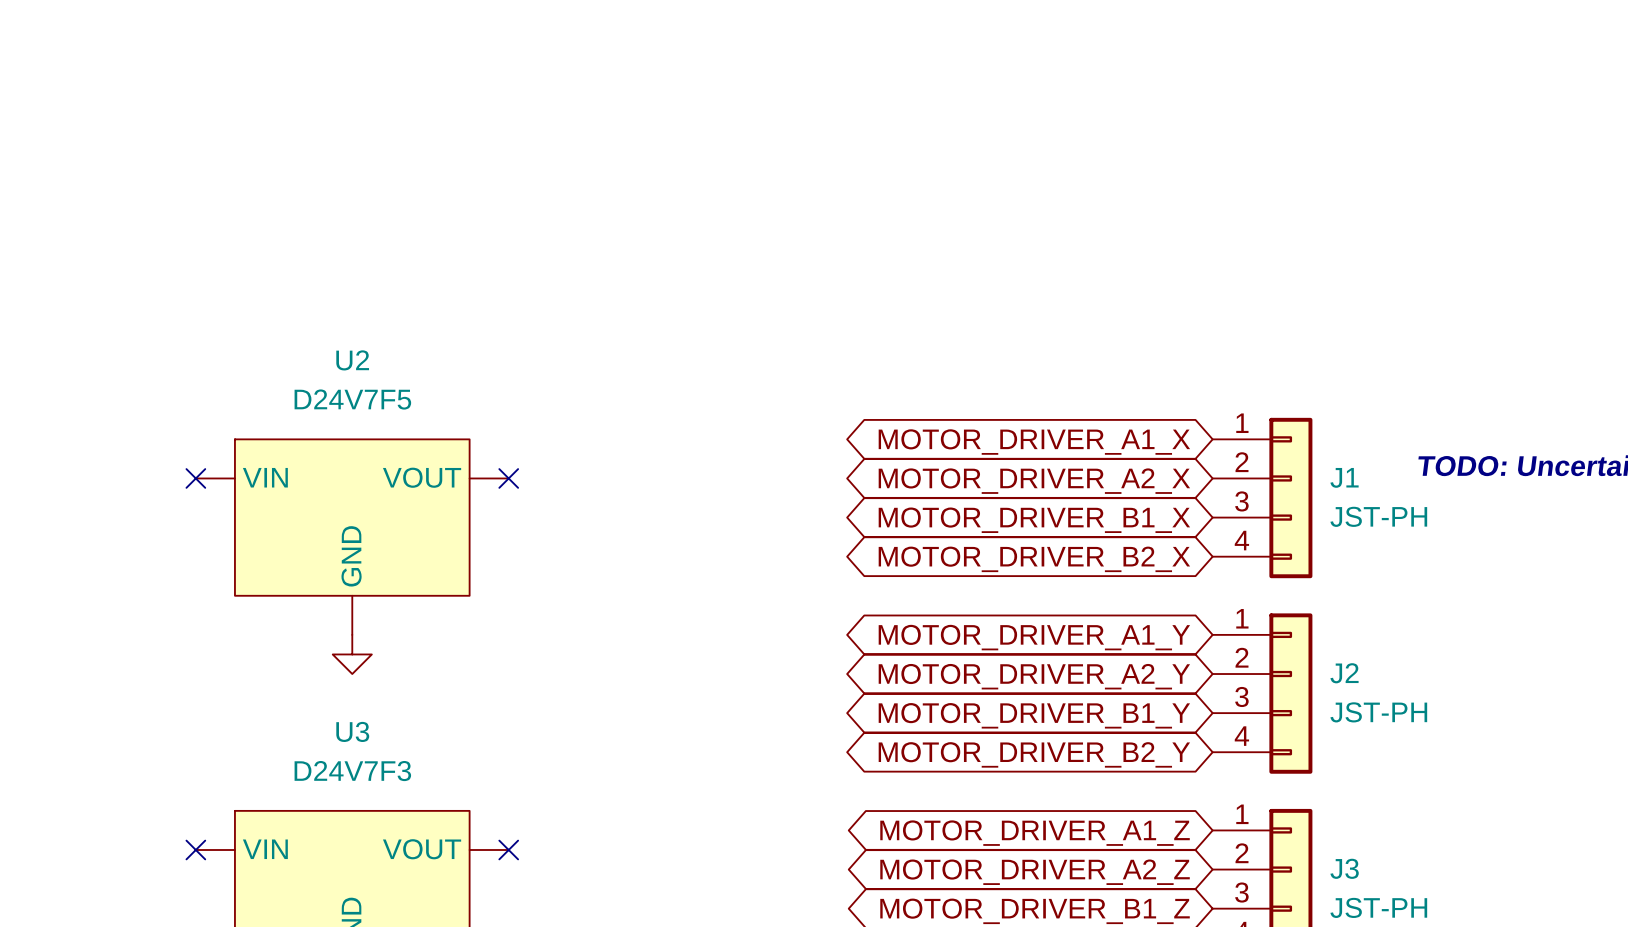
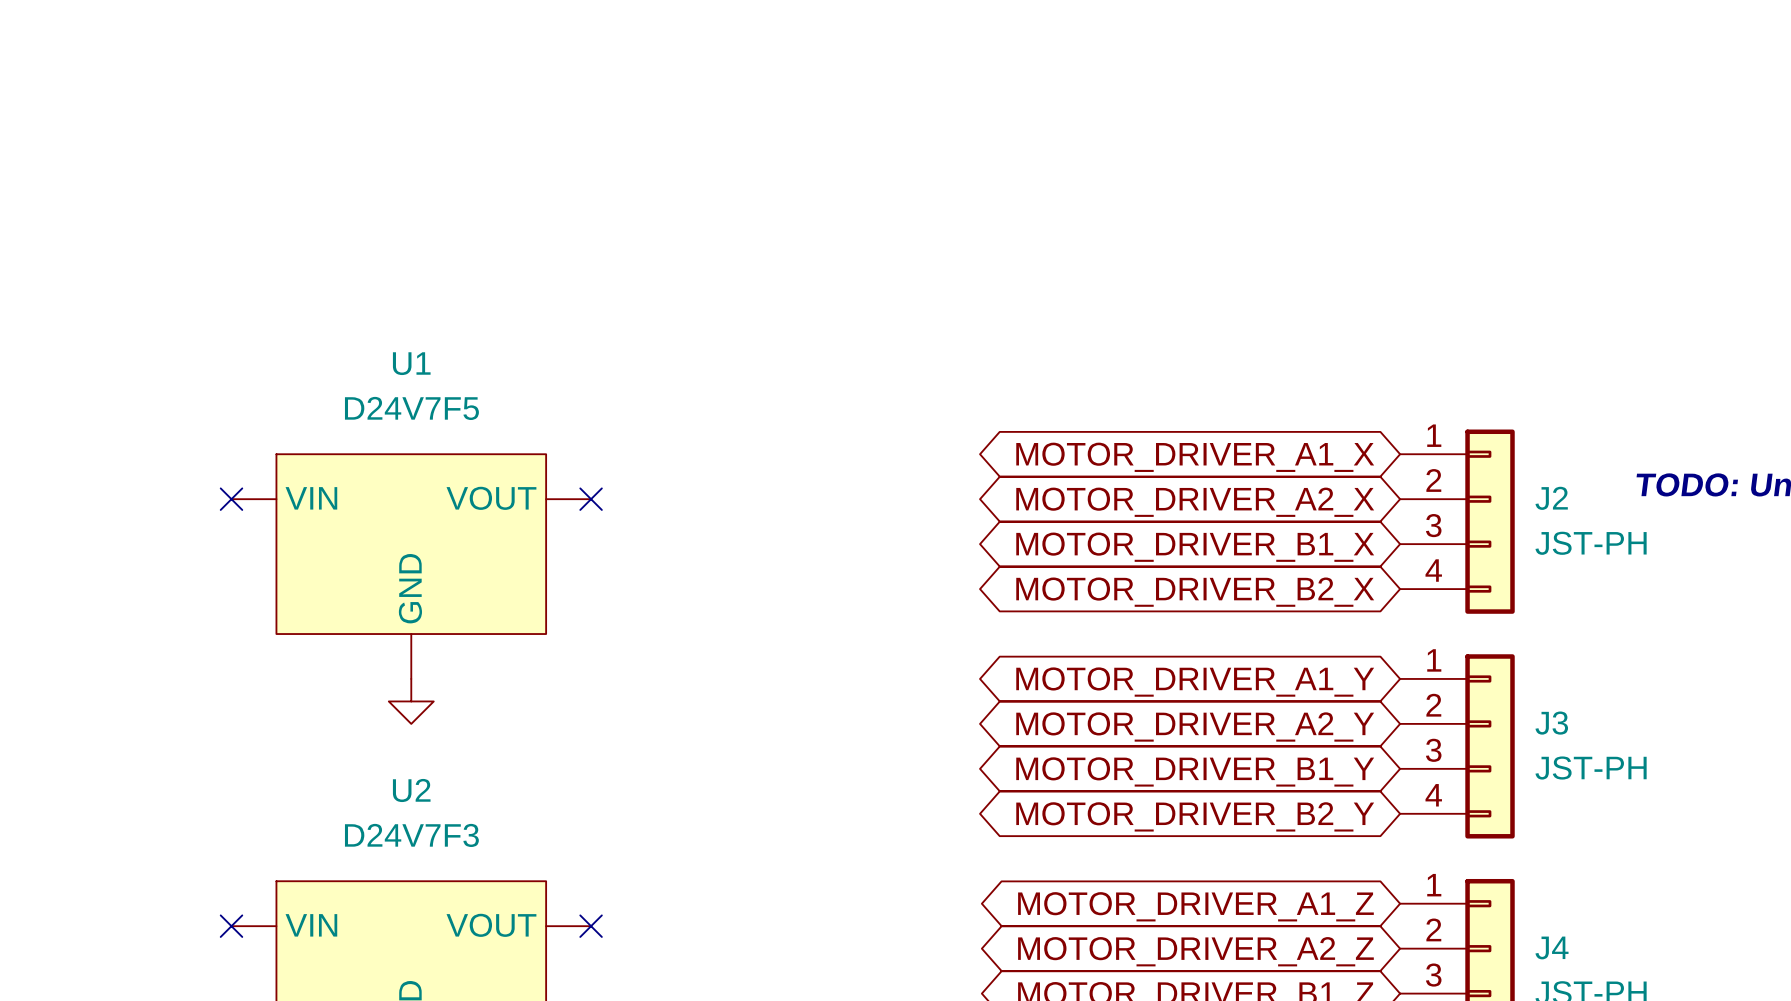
U2 name: U2 (352, 360) -> U1 (411, 363)
J1 name: J1 (1344, 477) -> J2 (1551, 498)
J2 name: J2 (1344, 673) -> J3 (1551, 723)
U3 name: U3 (352, 731) -> U2 (411, 790)
J3 name: J3 (1344, 868) -> J4 (1551, 947)

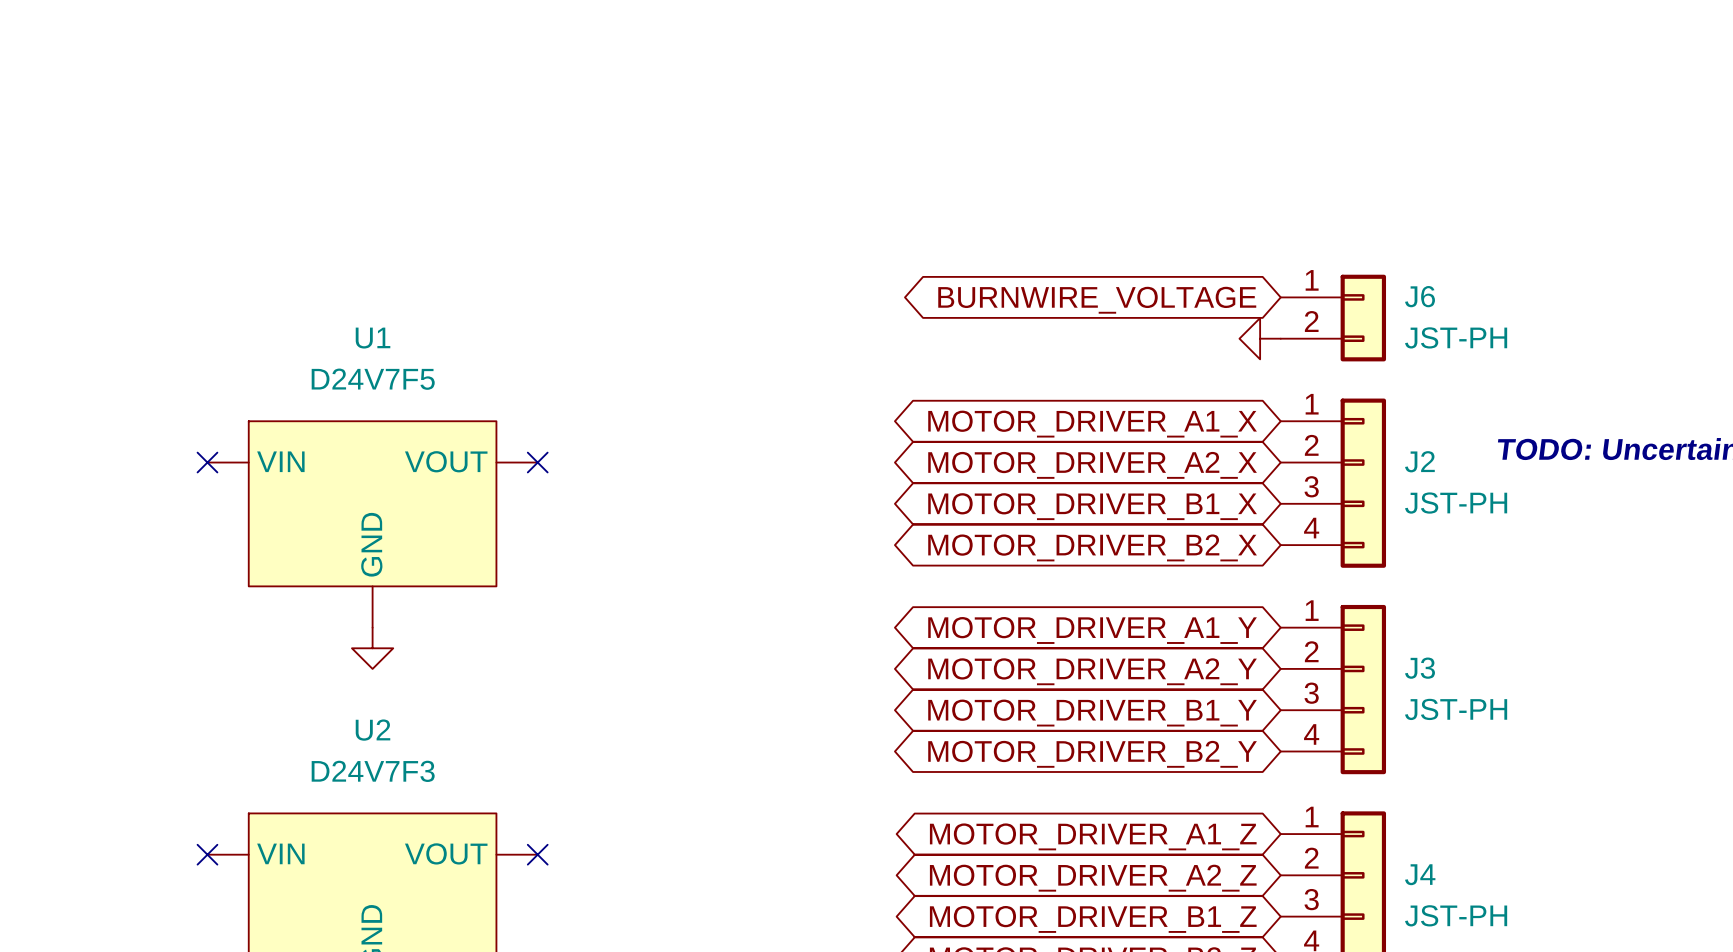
global label: none -> BURNWIRE_VOLTAGE (1097, 300)
J6: none -> JST-PH (1333, 318)
power symbol: none -> (1260, 338)

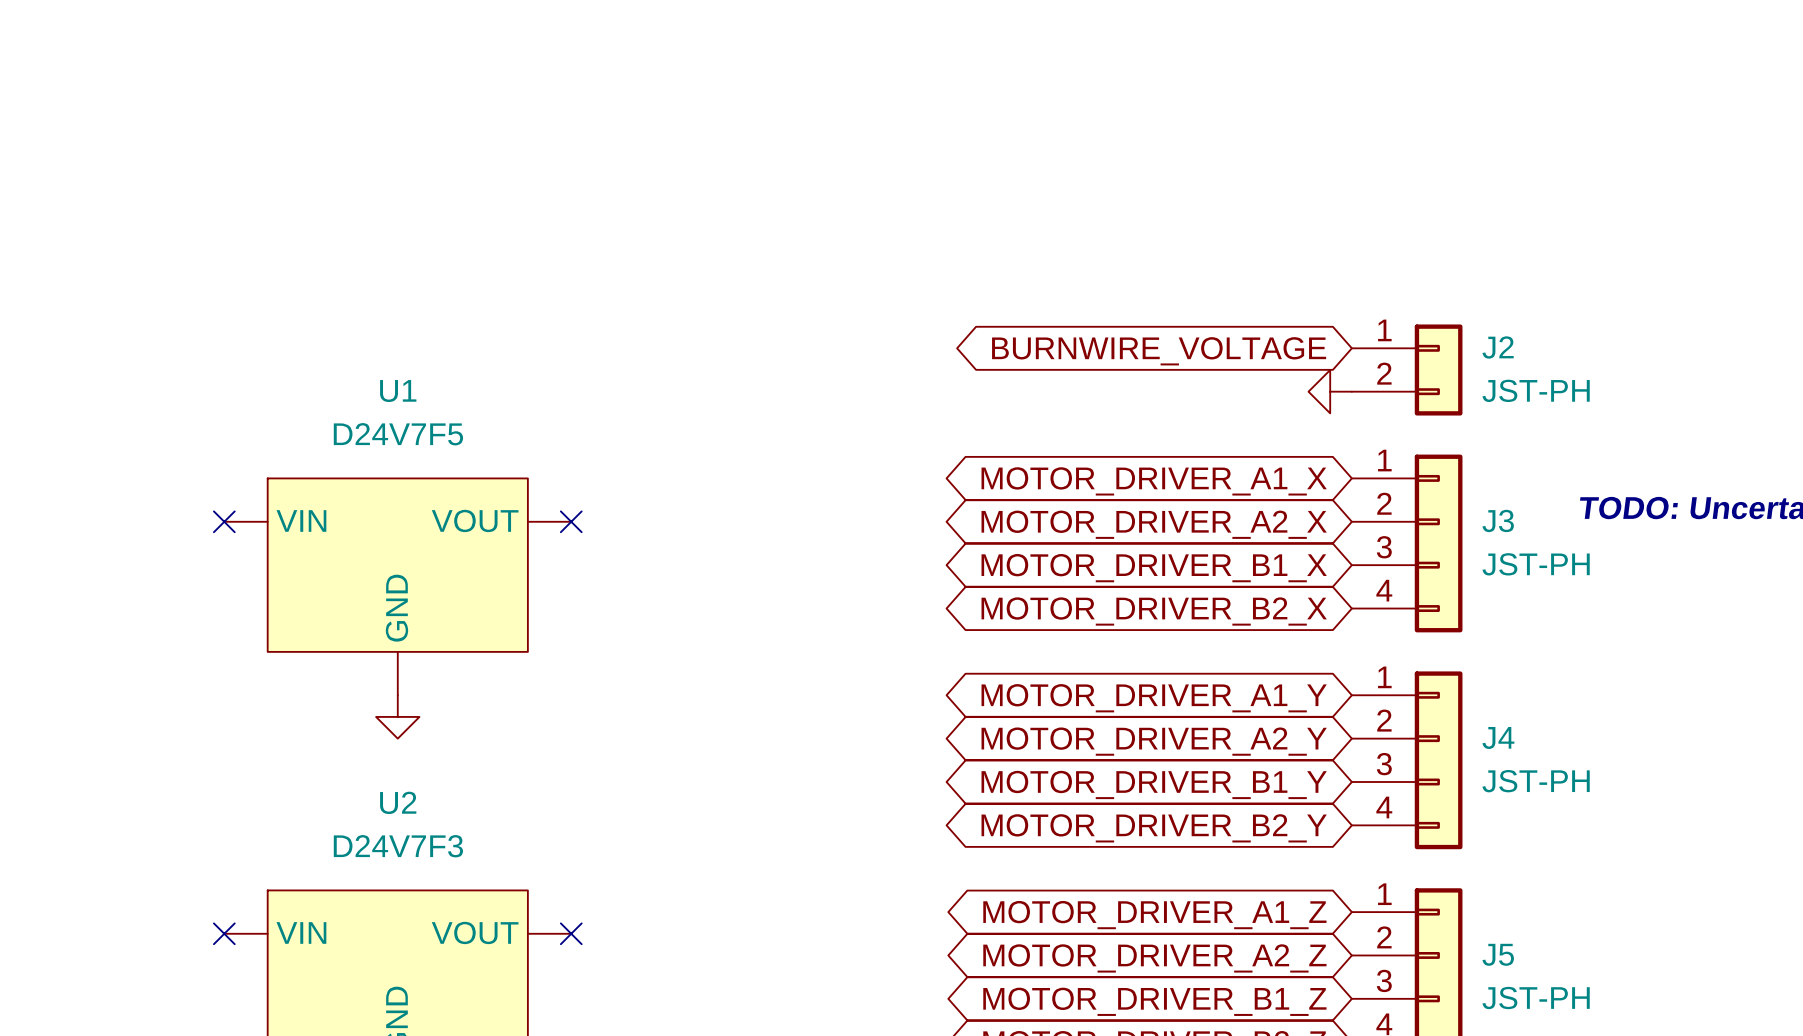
J6 name: J6 (1420, 296) -> J2 (1498, 347)
J2 name: J2 (1419, 461) -> J3 (1498, 520)
J3 name: J3 (1420, 668) -> J4 (1498, 737)
J4 name: J4 (1420, 874) -> J5 (1498, 954)

